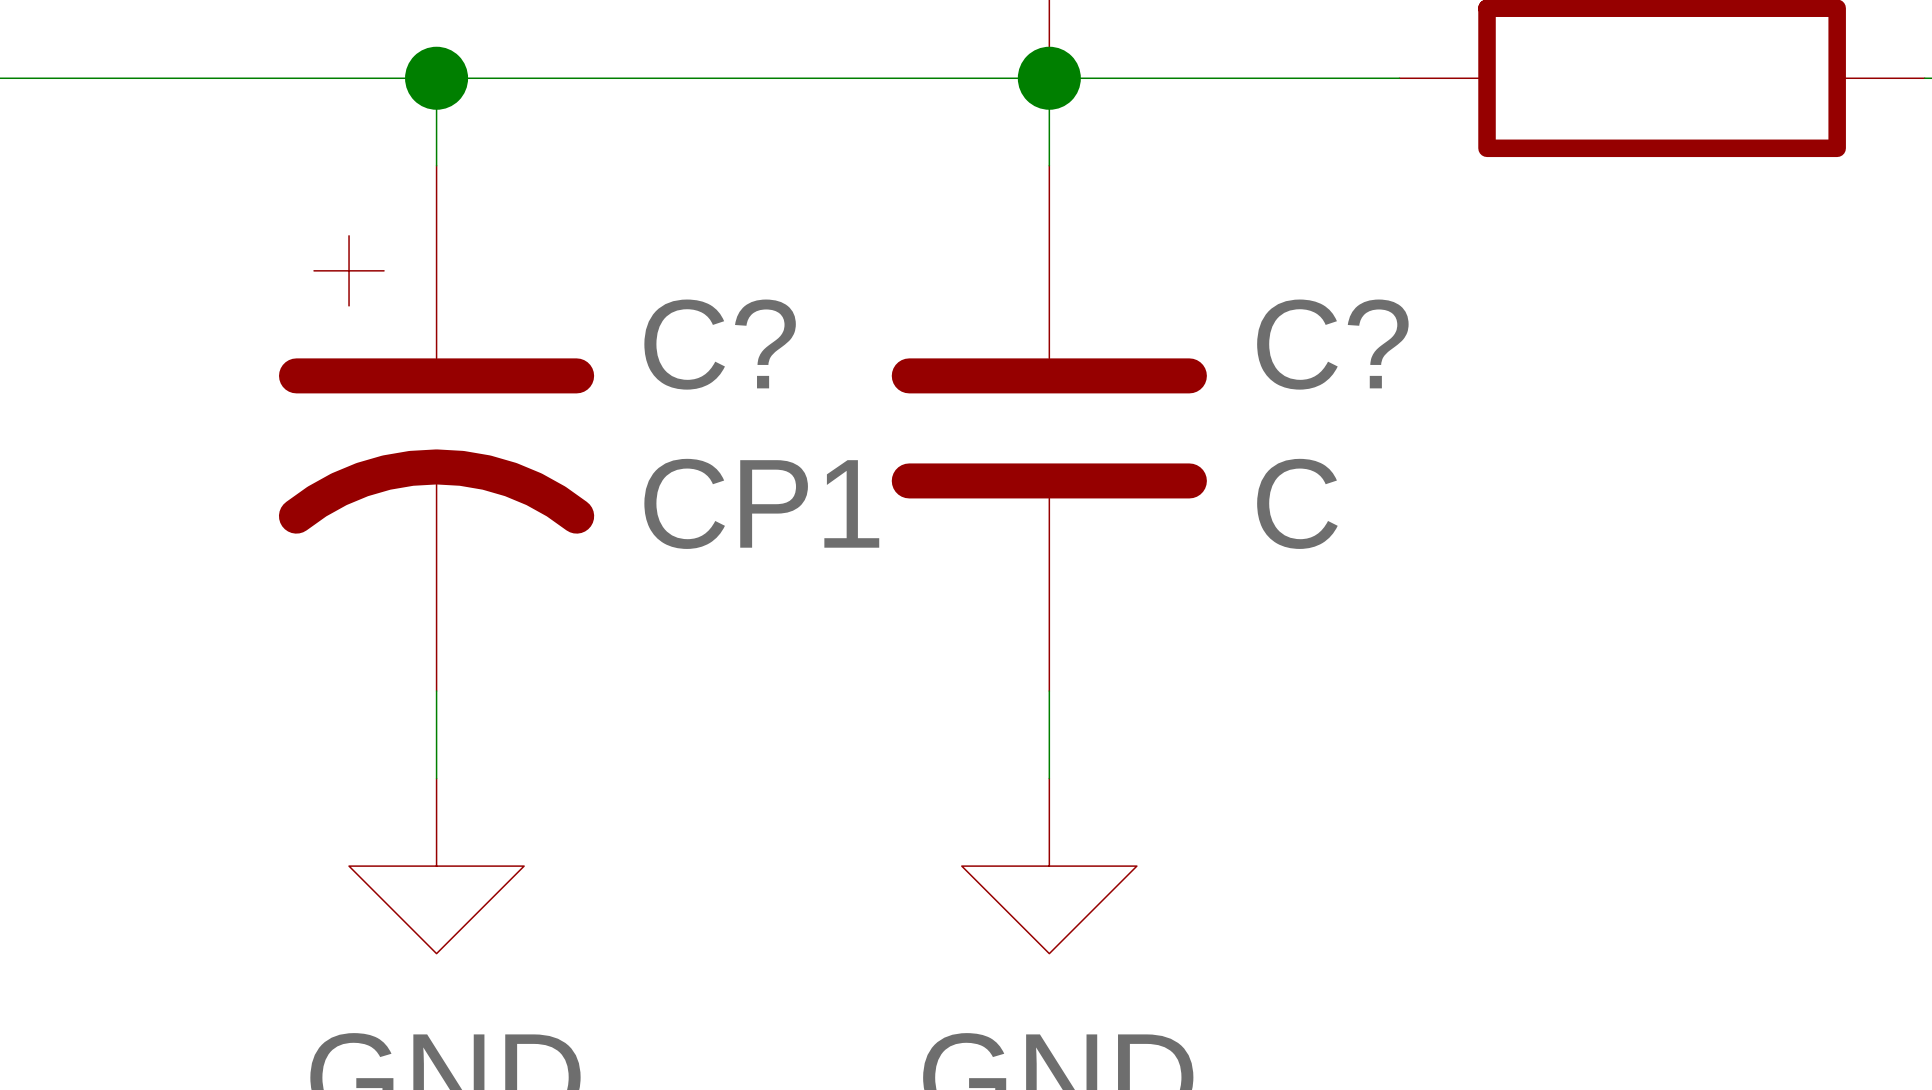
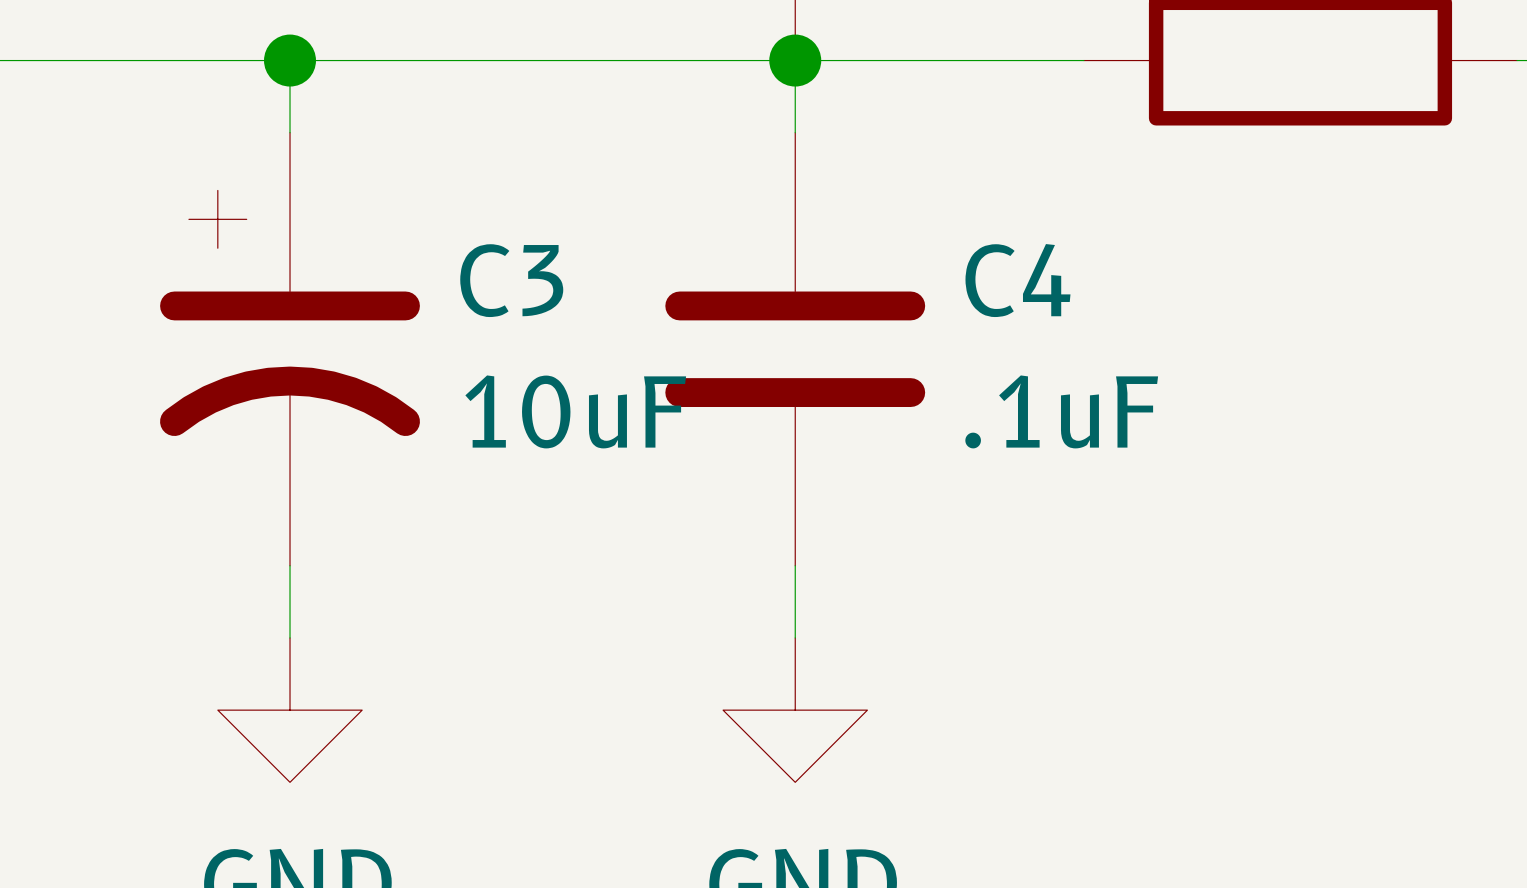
C? name: C? (720, 344) -> C3 (511, 280)
C? name: C? (1332, 344) -> C4 (1017, 280)
C? value: CP1 (761, 503) -> 10uF (575, 411)
C? value: C (1297, 503) -> .1uF (1061, 411)

